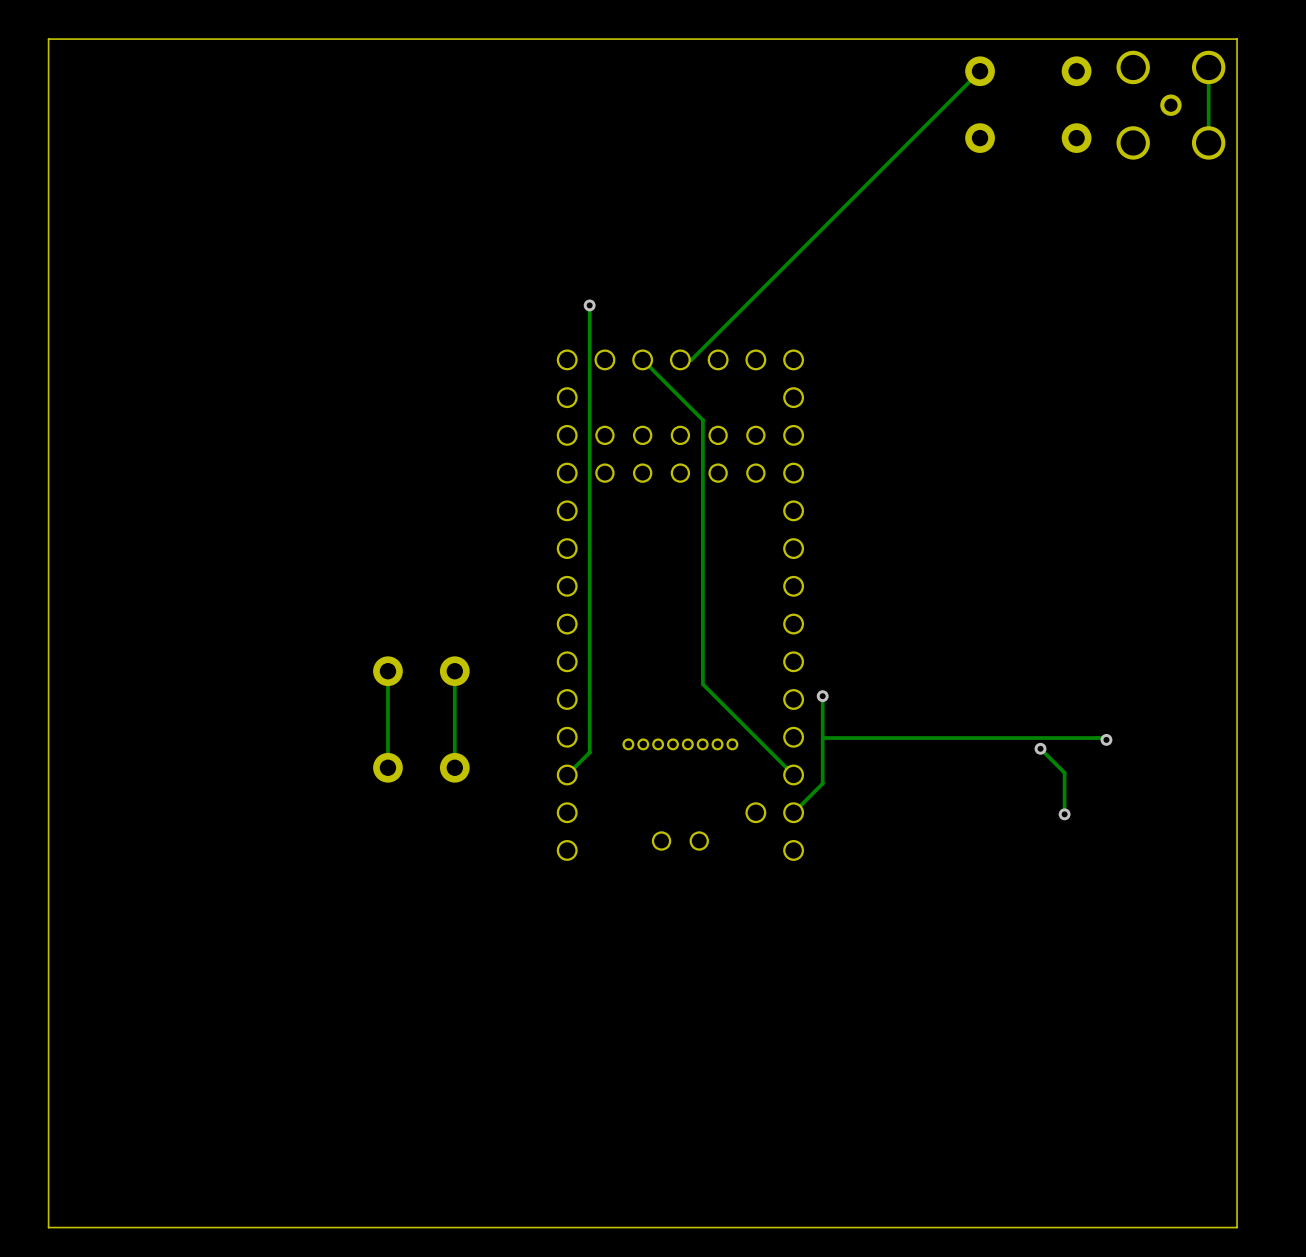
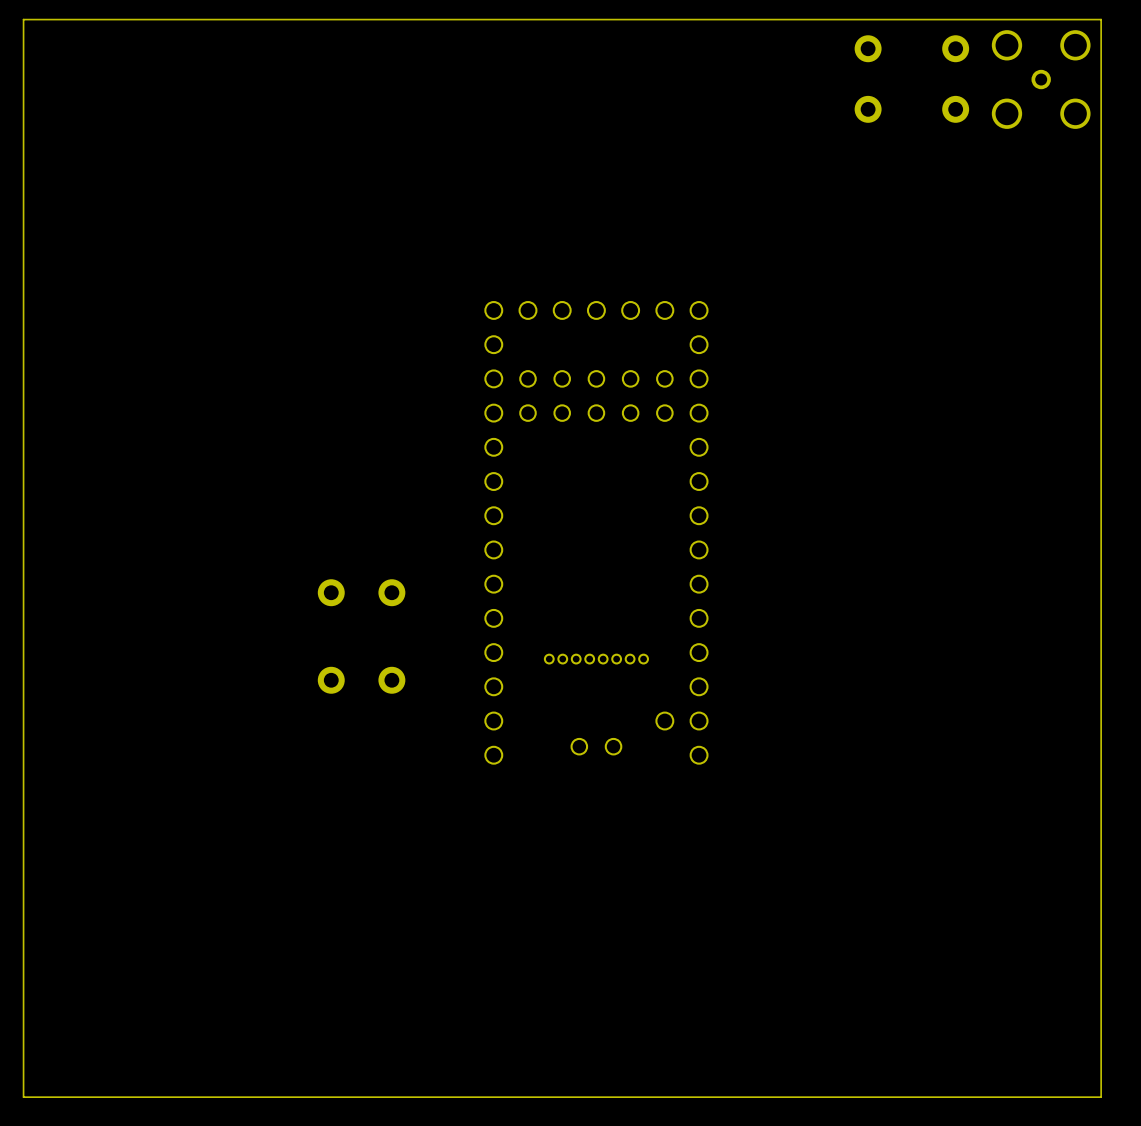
track: (1208, 67) (1208, 142) -> none
track: (980, 71) (691, 359) (680, 359) -> none
track: (589, 305) (589, 752) (567, 774) -> none
via: (589, 305) -> none
track: (642, 359) (702, 420) (702, 684) (793, 774) -> none
track: (387, 671) (387, 767) -> none
track: (454, 671) (454, 767) -> none
track: (822, 696) (822, 783) (793, 812) -> none
via: (822, 696) -> none
track: (822, 738) (1104, 738) (1106, 739) -> none
via: (1106, 739) -> none
track: (1040, 748) (1064, 772) (1064, 814) -> none
via: (1040, 748) -> none
via: (1064, 814) -> none

